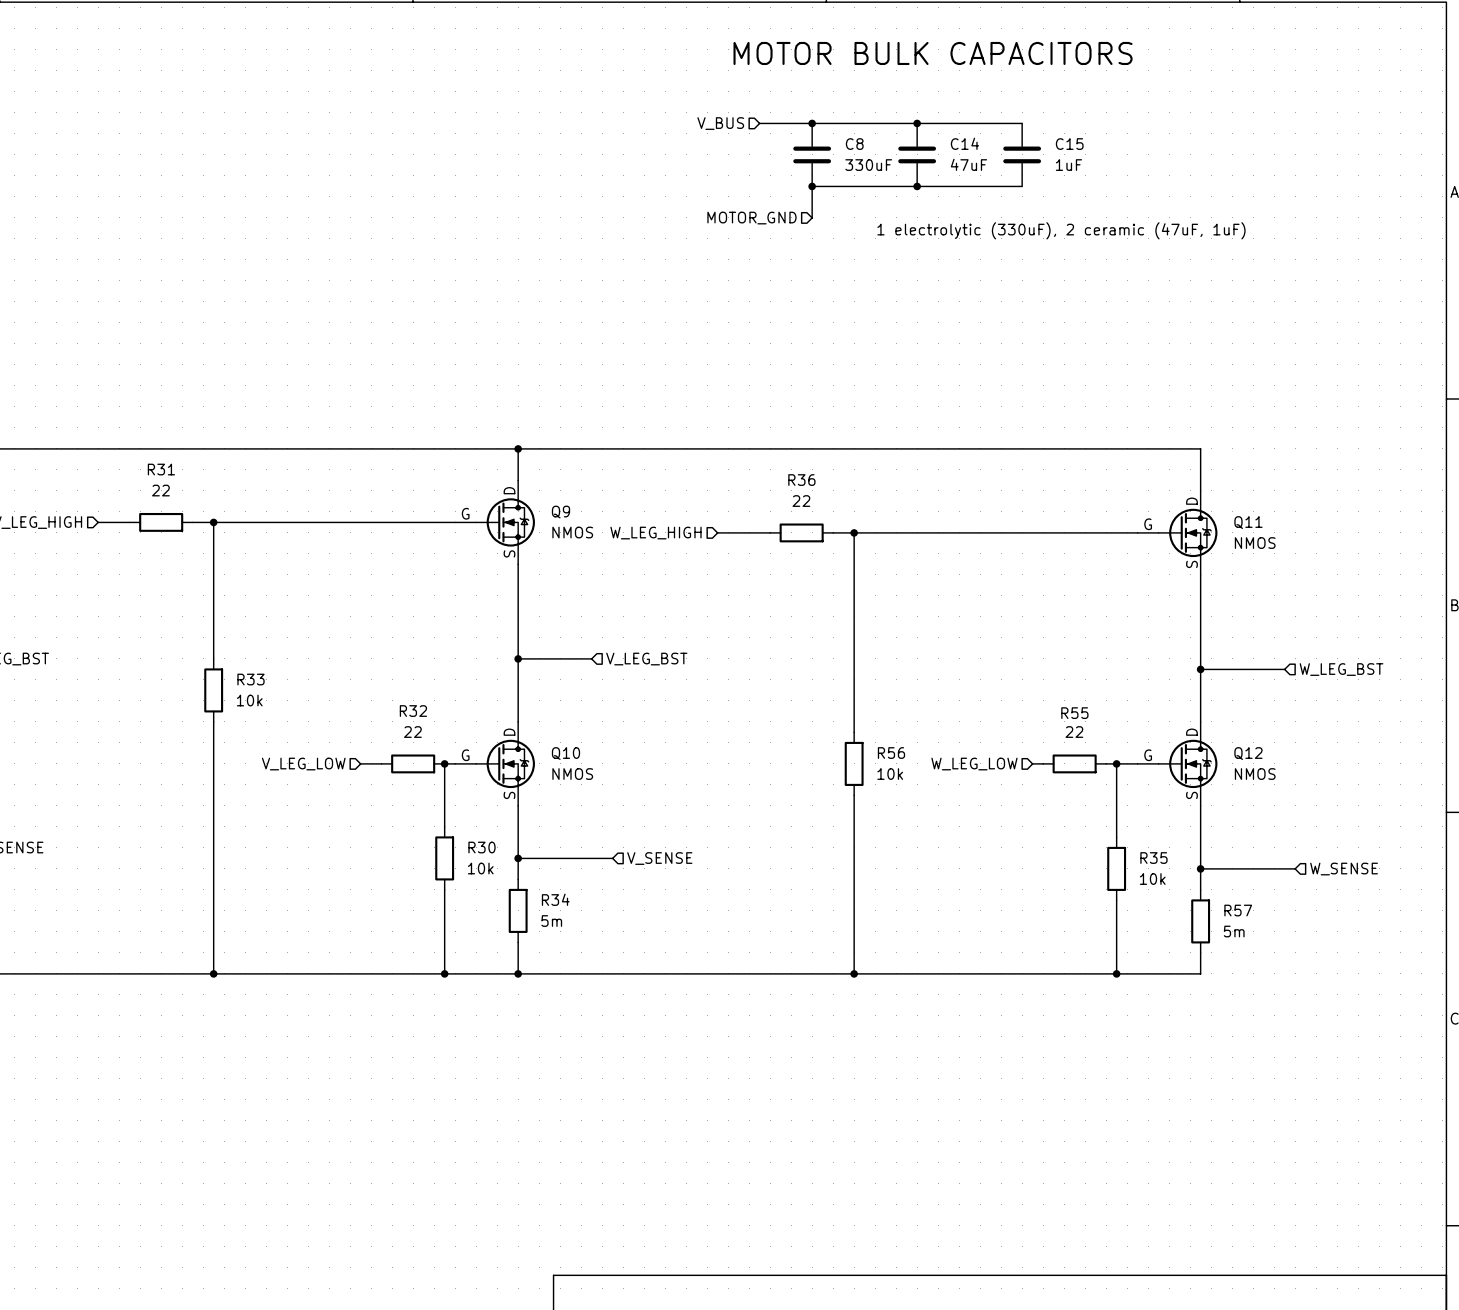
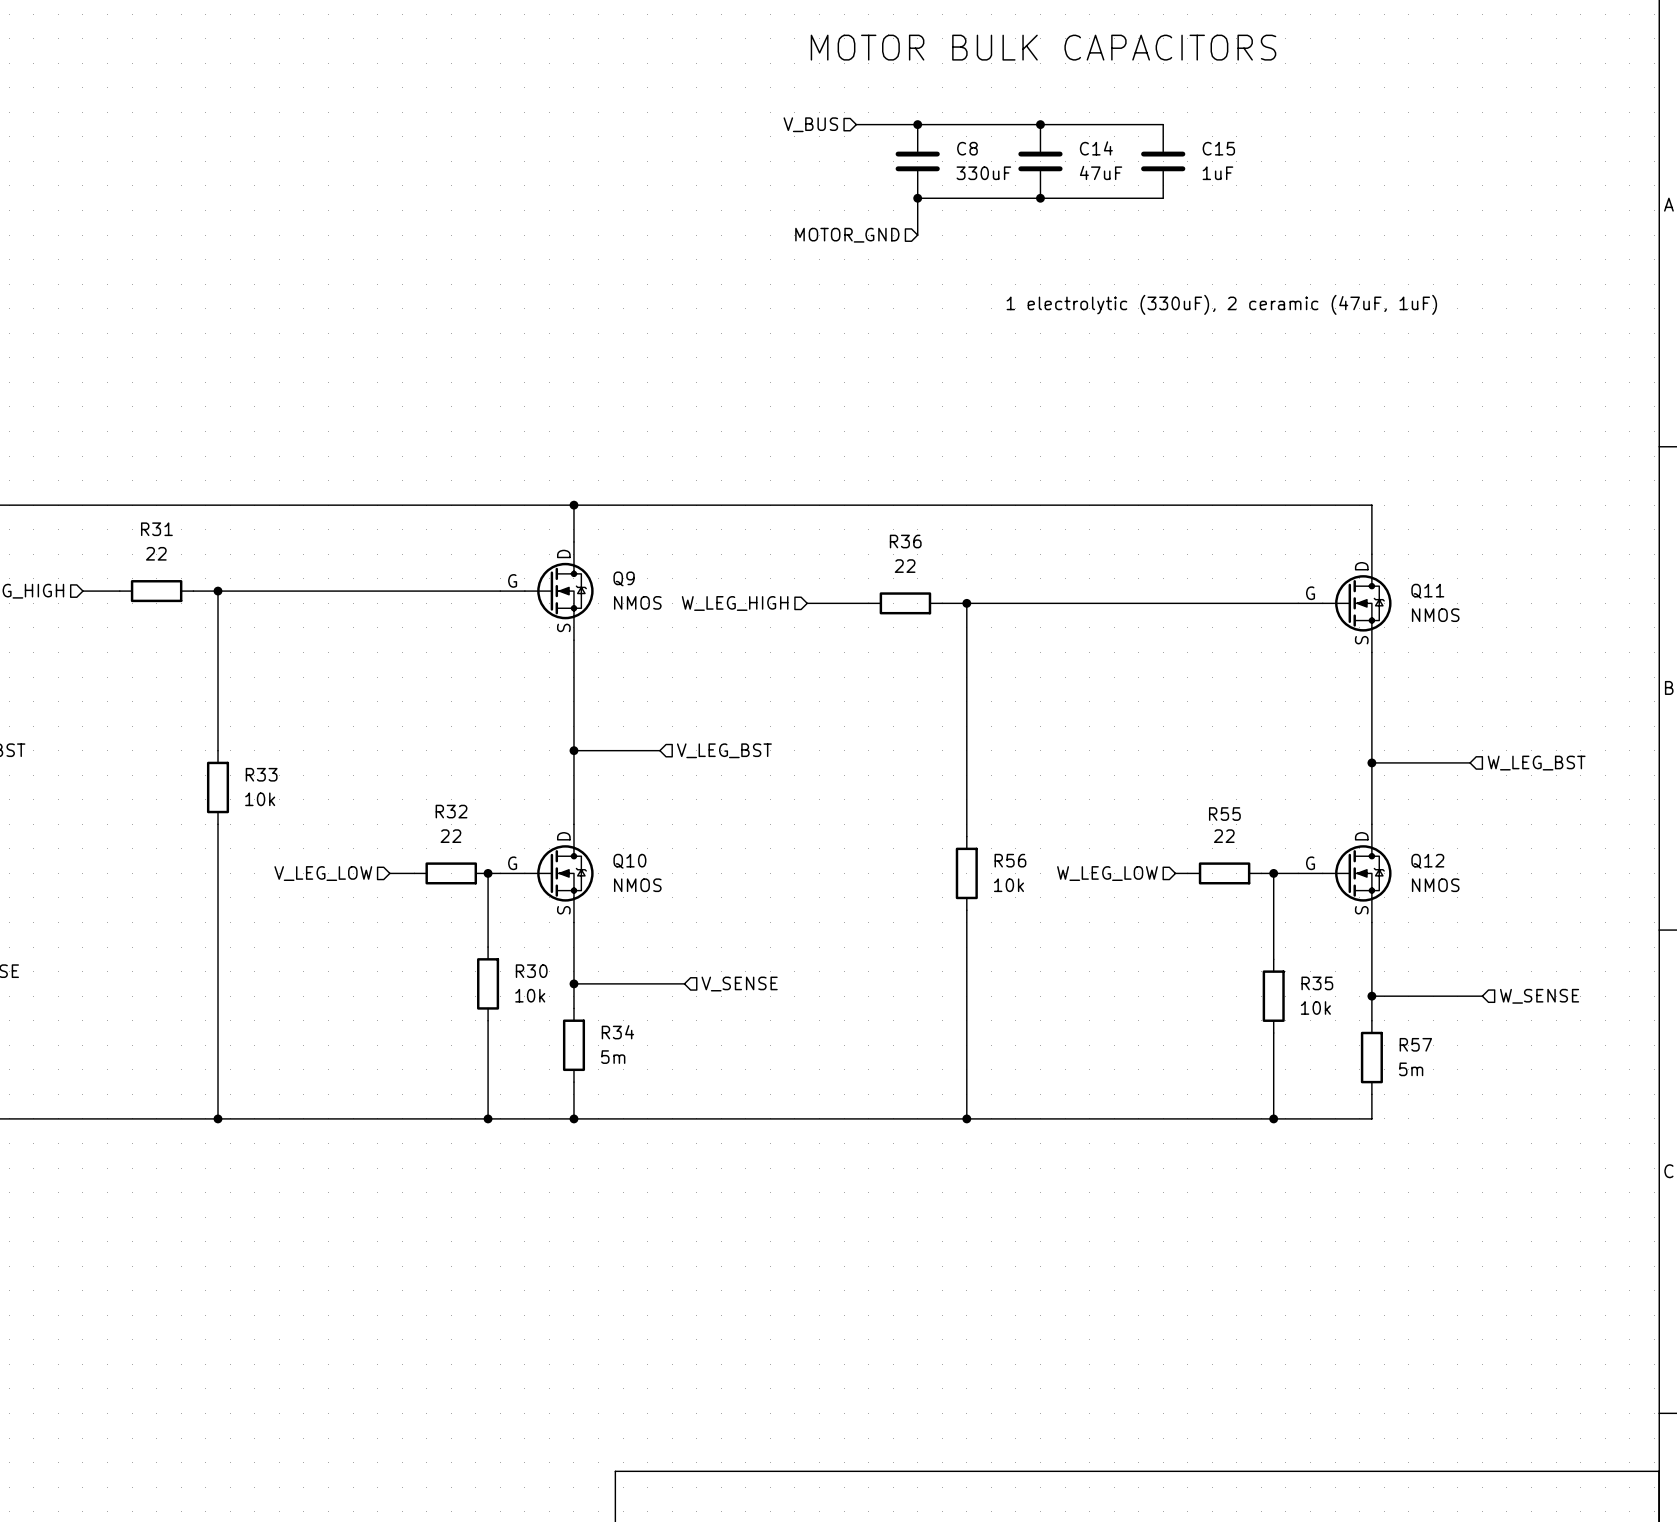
label: MOTOR BULK CAPACITORS (933, 53) -> none
text: none -> MOTOR BULK CAPACITORS (1043, 47)
label: 1 electrolytic (330uF), 2 ceramic (47uF, 1uF) (1061, 230) -> none
text: none -> 1 electrolytic (330uF), 2 ceramic (47uF, 1uF) (1221, 304)

